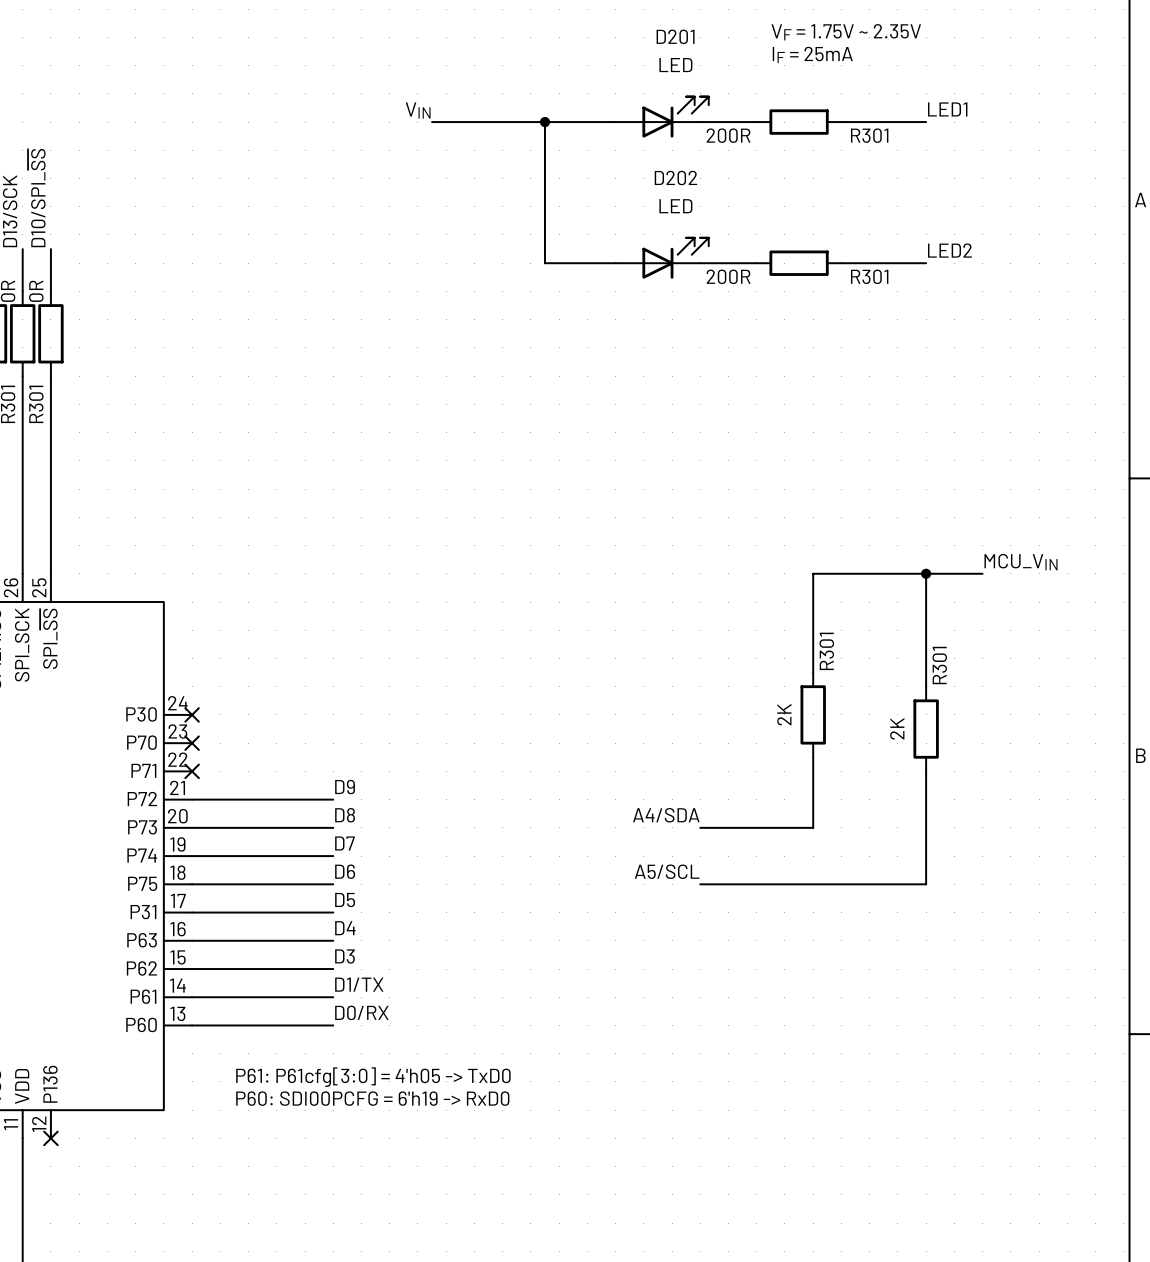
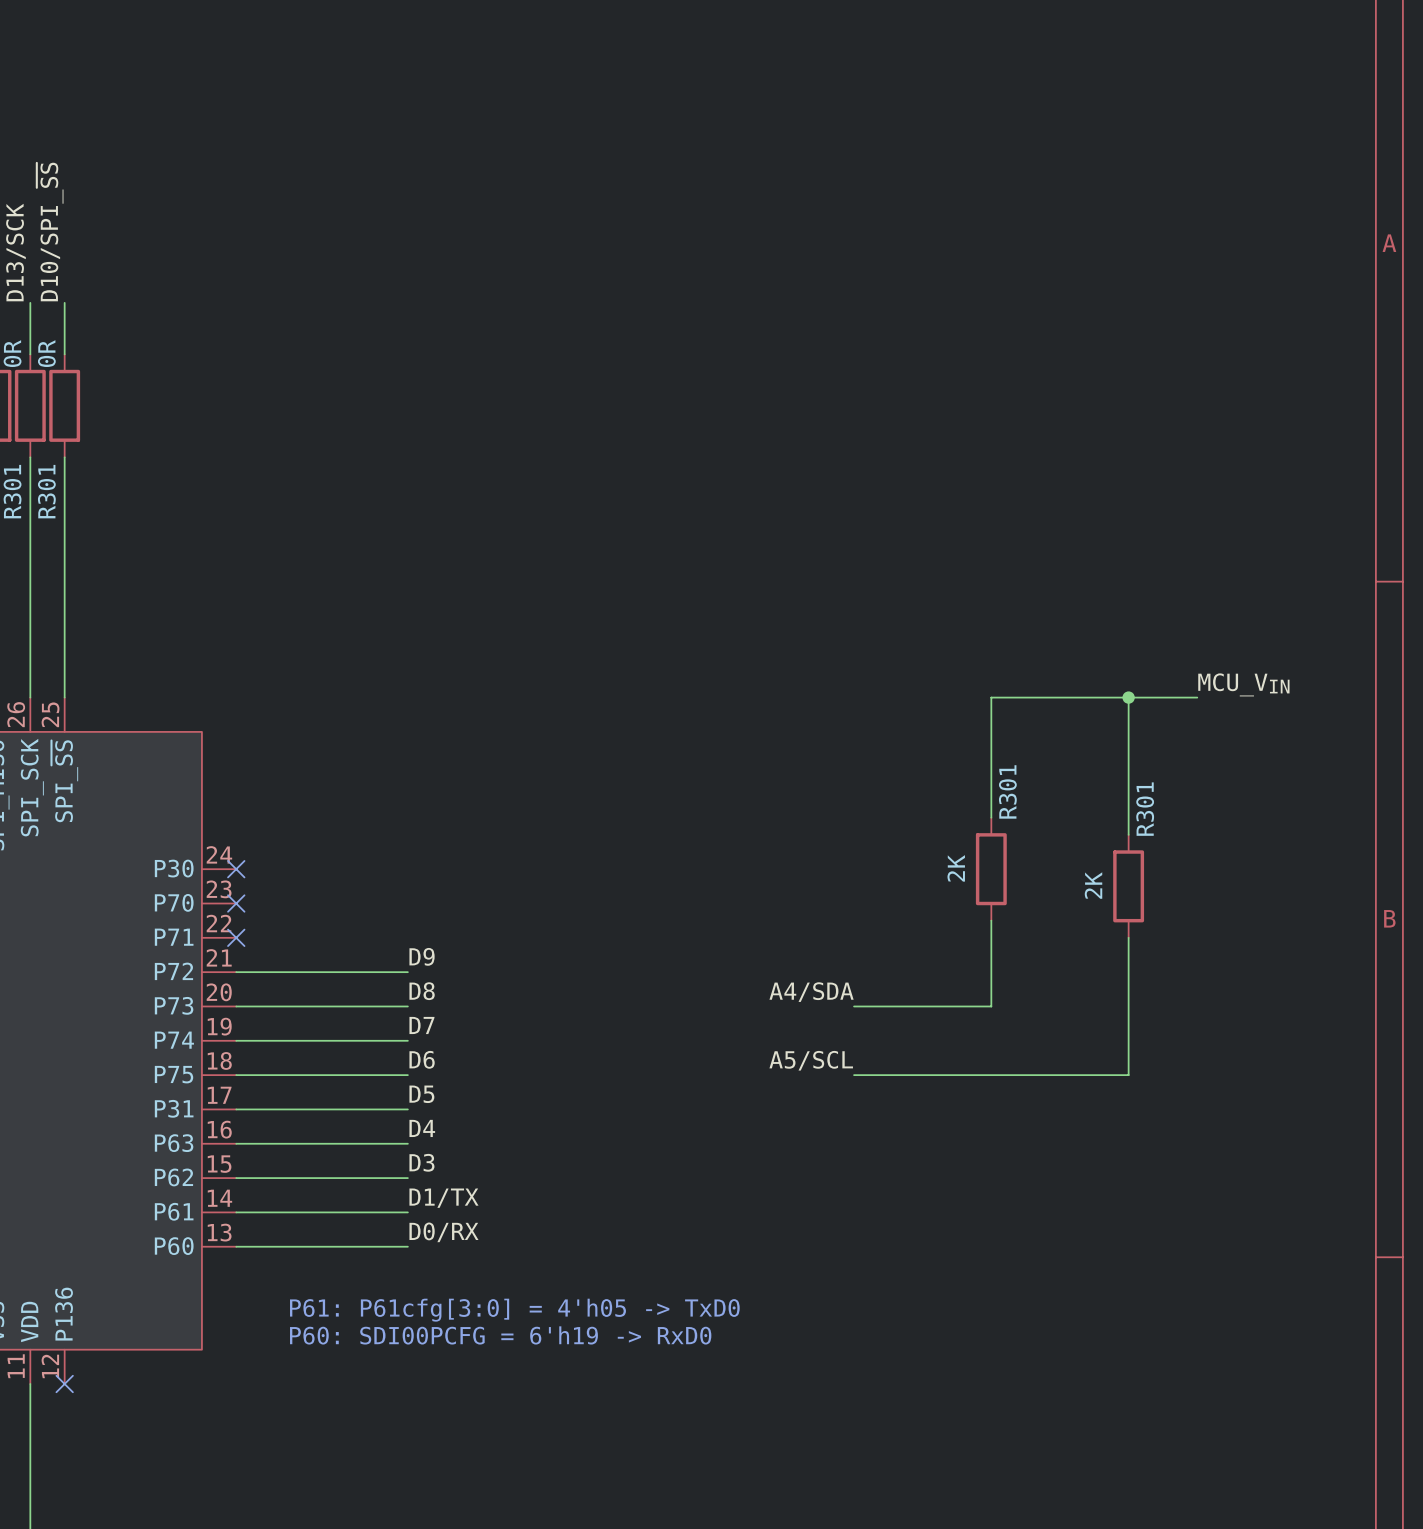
text: VF = 1.75V ~ 2.35V (846, 32) -> none
text: IF = 25mA (812, 55) -> none
label: LED1 (947, 109) -> none
label: VIN (418, 110) -> none
D201: LED (662, 117) -> none
wire: (432, 122) (615, 122) -> none
wire: (544, 122) (544, 263) (615, 263) -> none
junction: (544, 122) -> none
wire: (700, 122) (756, 122) -> none
R301: 200R (799, 122) -> none
wire: (841, 122) (926, 122) -> none
label: LED2 (949, 250) -> none
D202: LED (662, 258) -> none
wire: (700, 263) (756, 263) -> none
R301: 200R (799, 263) -> none
wire: (841, 263) (926, 263) -> none

